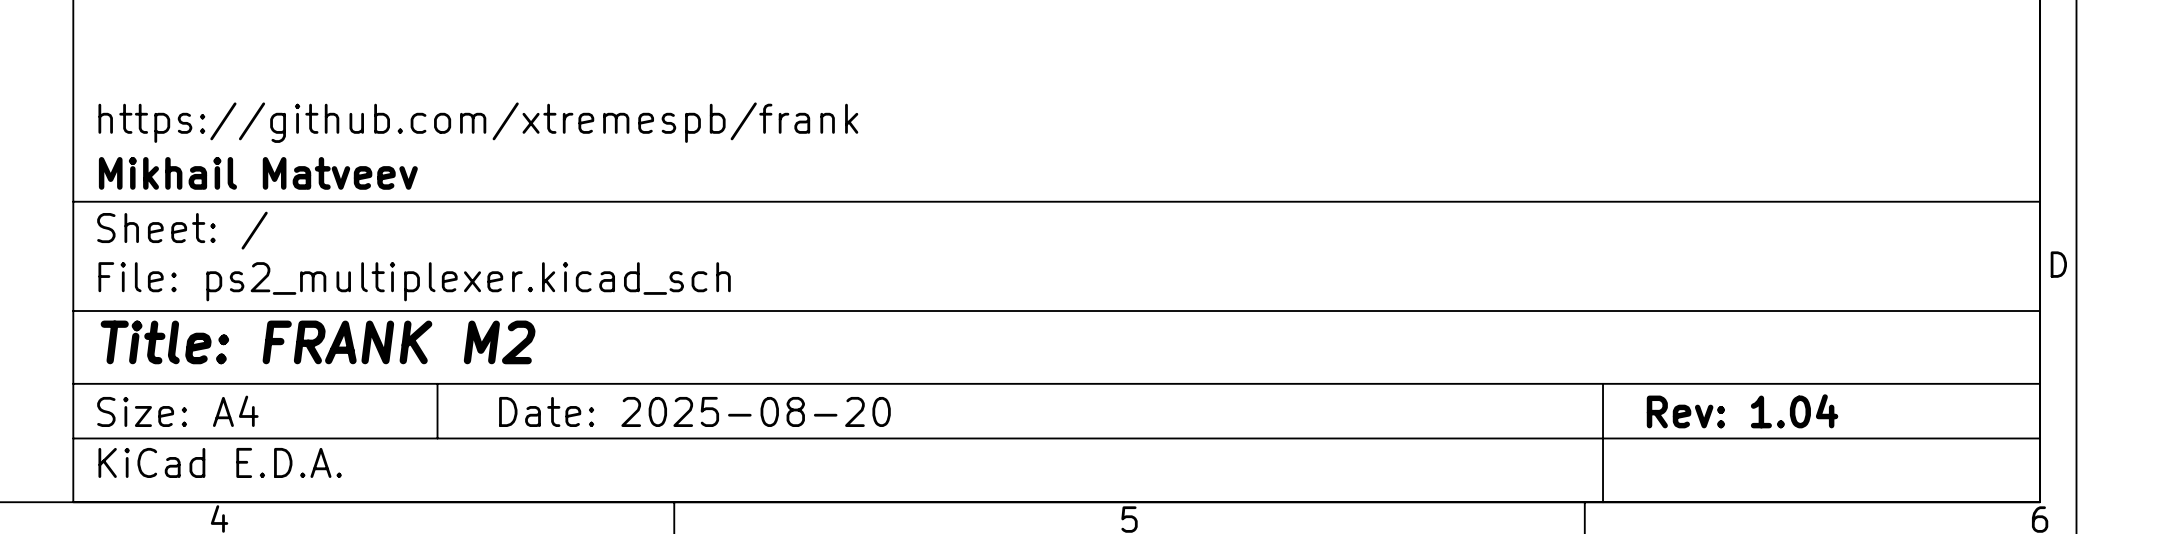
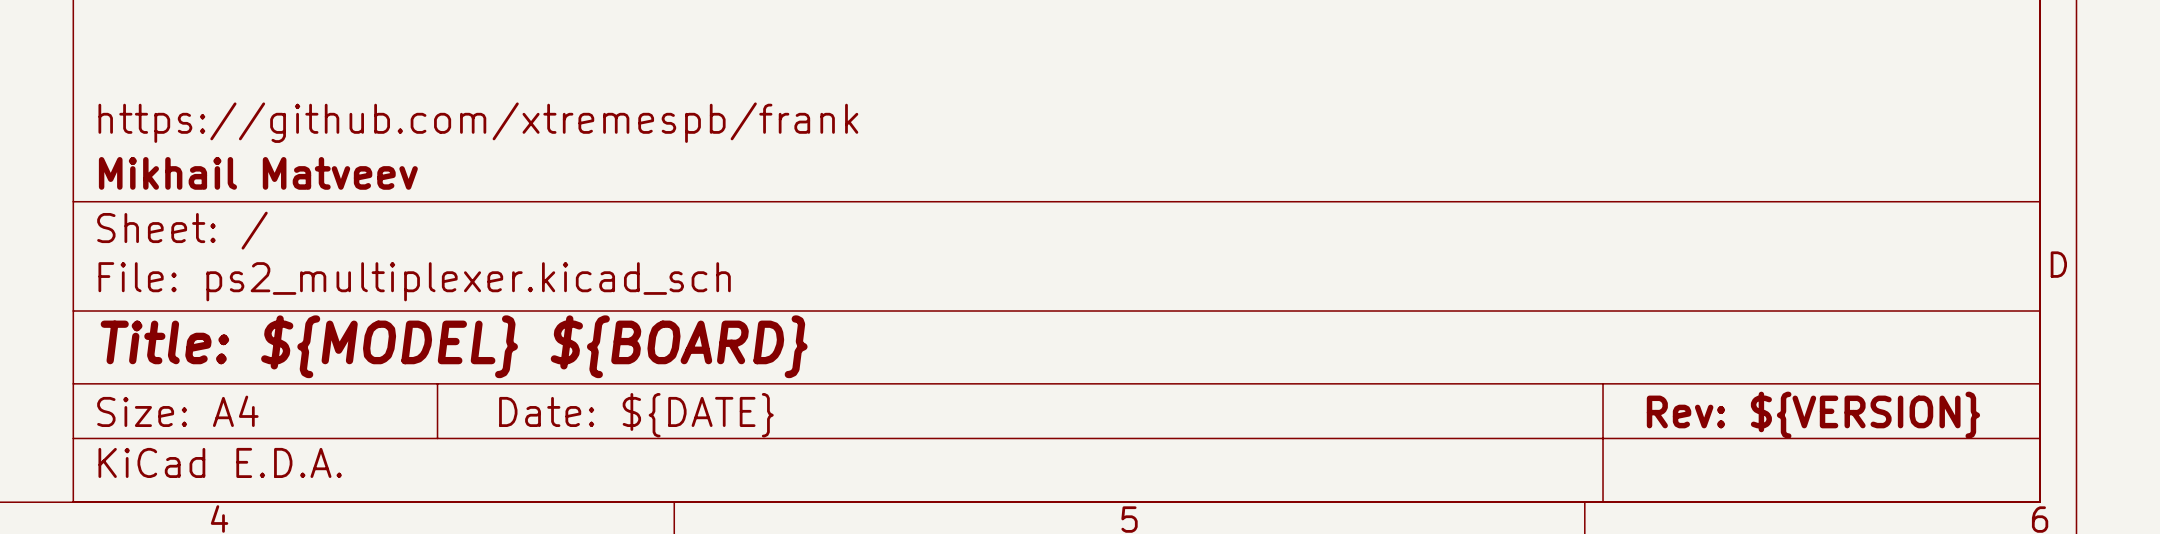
title block: Title: FRANK M2 (318, 342) -> Title: ${MODEL} ${BOARD} (454, 346)
title block: Date: 2025-08-20 (694, 411) -> Date: ${DATE} (636, 415)
title block: Rev: 1.04 (1742, 411) -> Rev: ${VERSION} (1813, 415)

